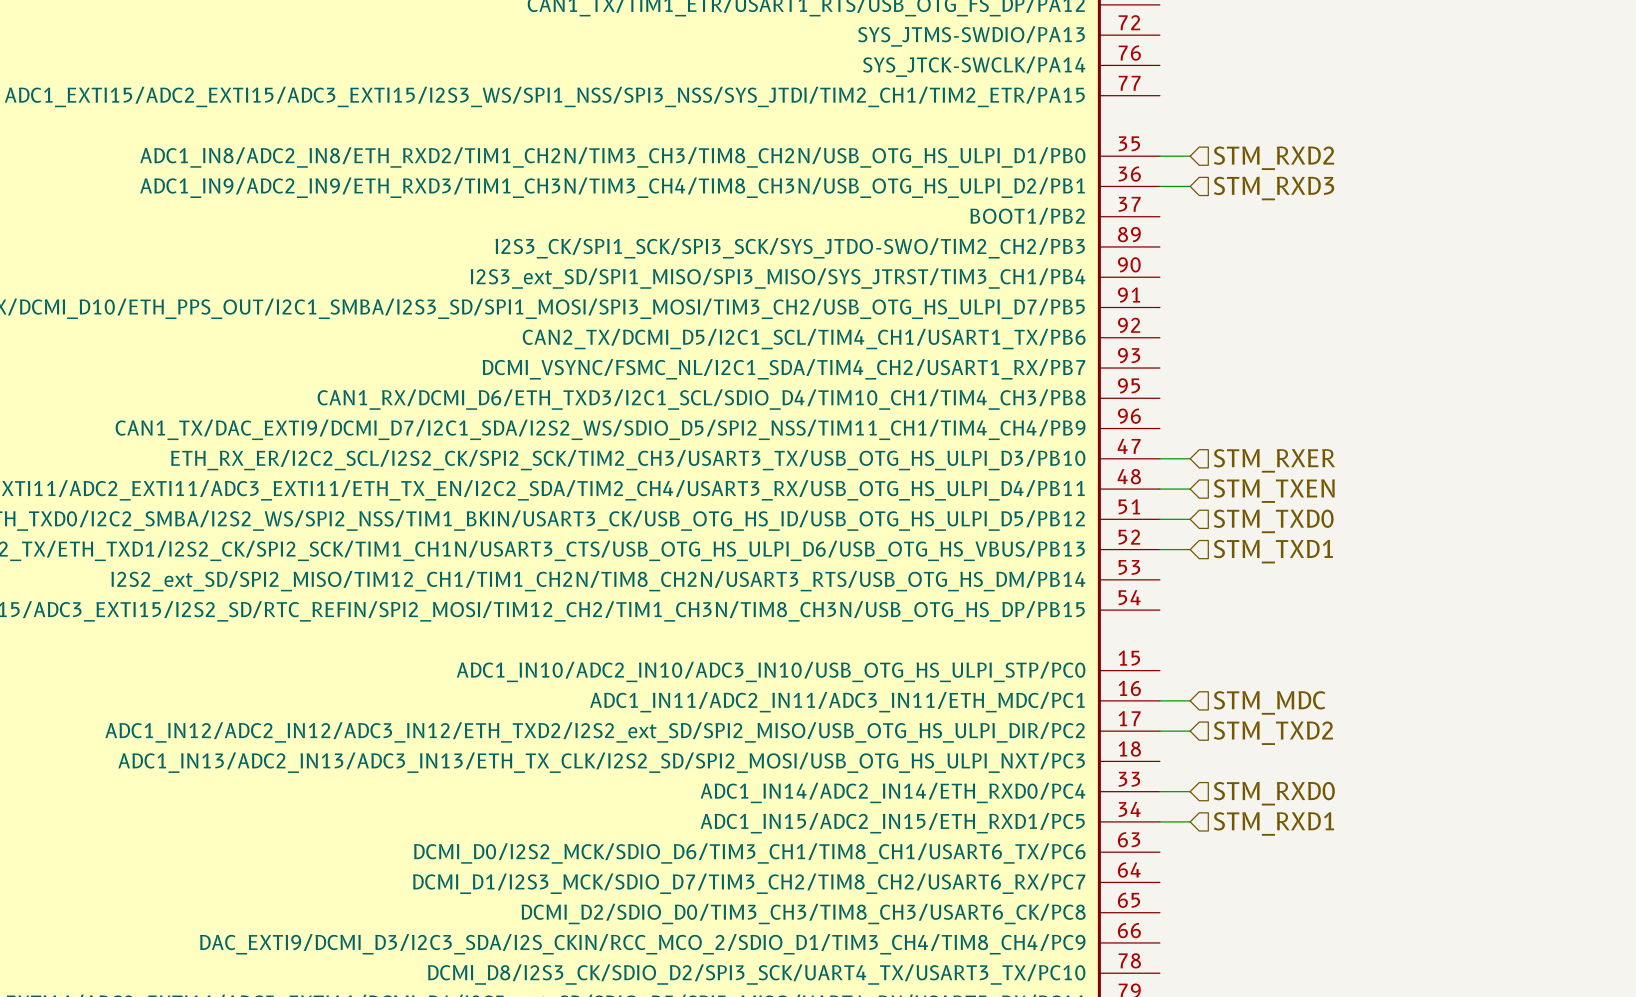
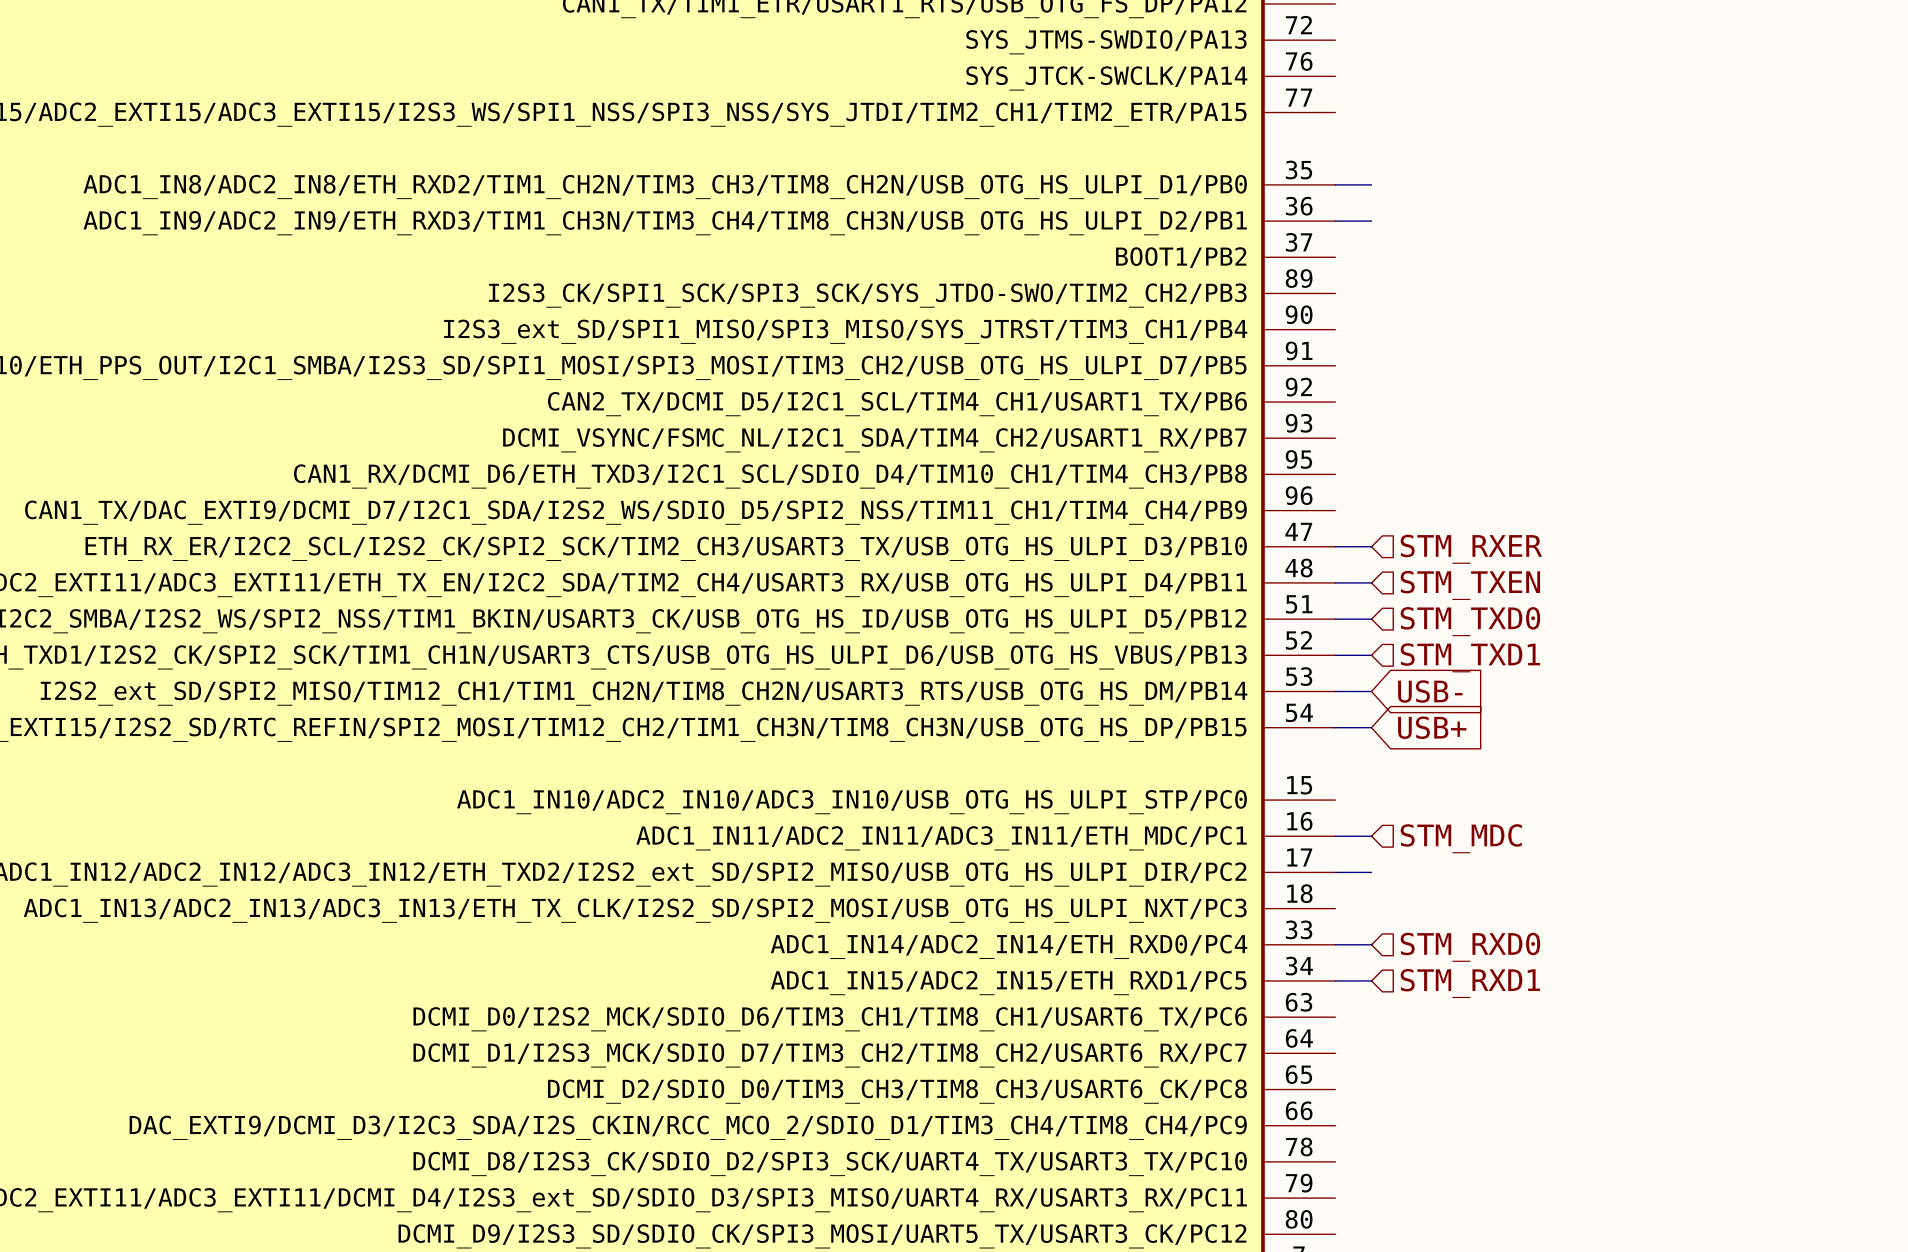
hierarchical label: STM_RXD2 (1273, 158) -> none
hierarchical label: STM_RXD3 (1274, 188) -> none
wire: none -> (1335, 691) (1371, 691)
global label: none -> USB- (1430, 691)
wire: none -> (1335, 727) (1371, 727)
global label: none -> USB+ (1432, 727)
hierarchical label: STM_TXD2 (1273, 733) -> none

